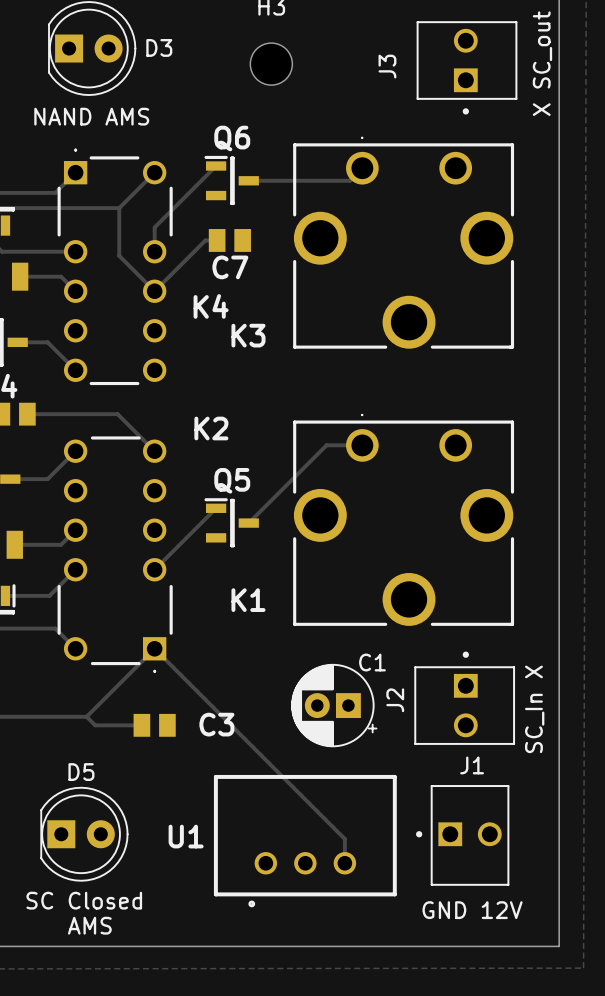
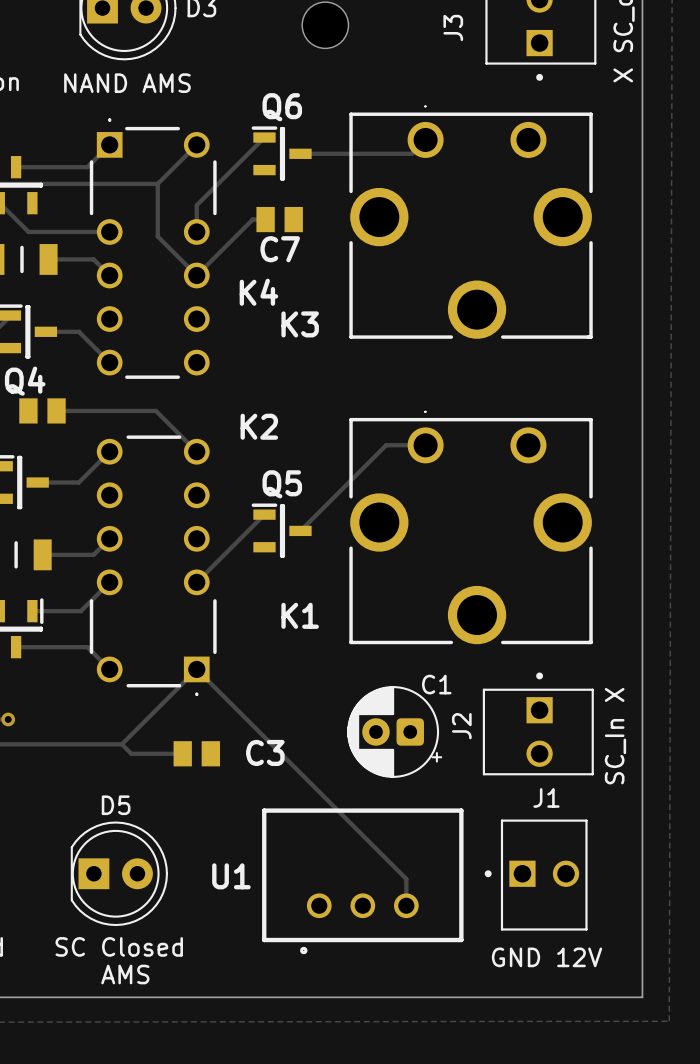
C1 footprint: [291, 663, 378, 748] -> [347, 686, 443, 778]

